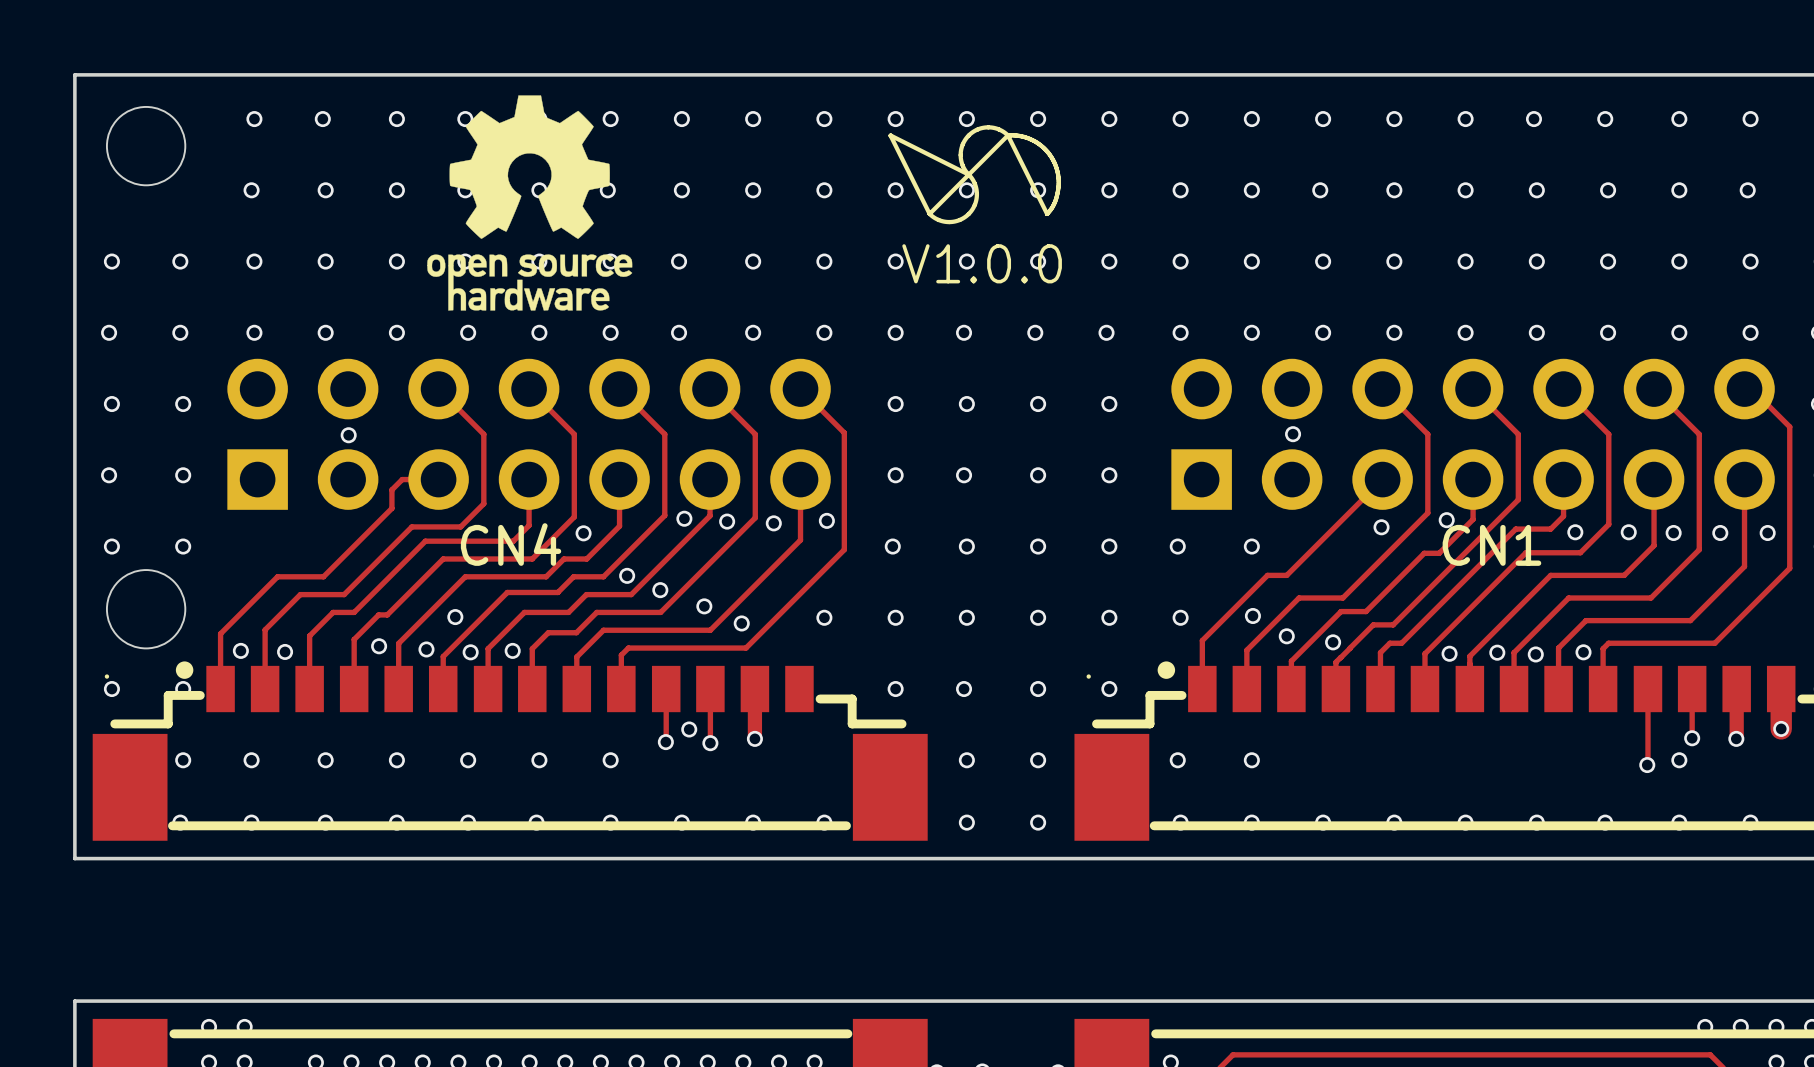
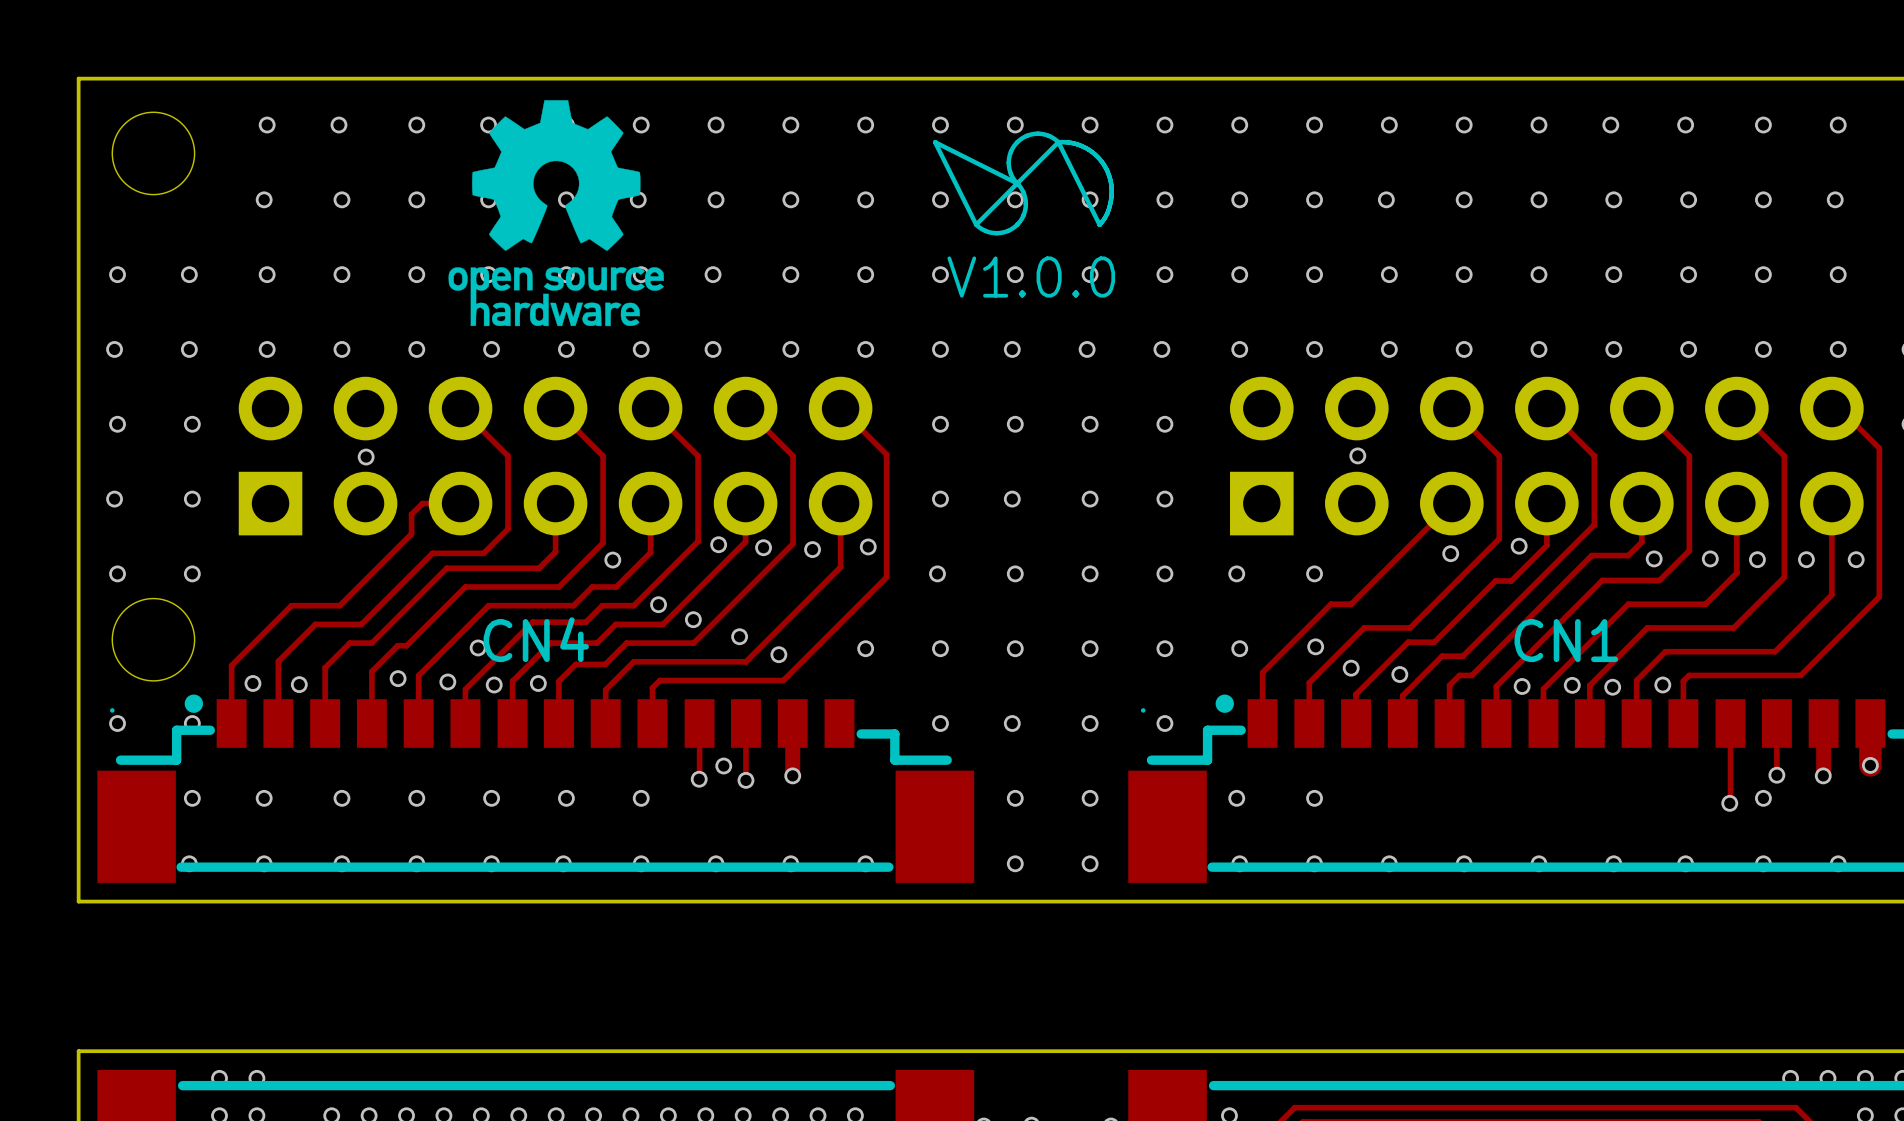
CN4 name position: CN4 (511, 544) -> CN4 (536, 639)
CN1 name position: CN1 (1491, 545) -> CN1 (1566, 640)

